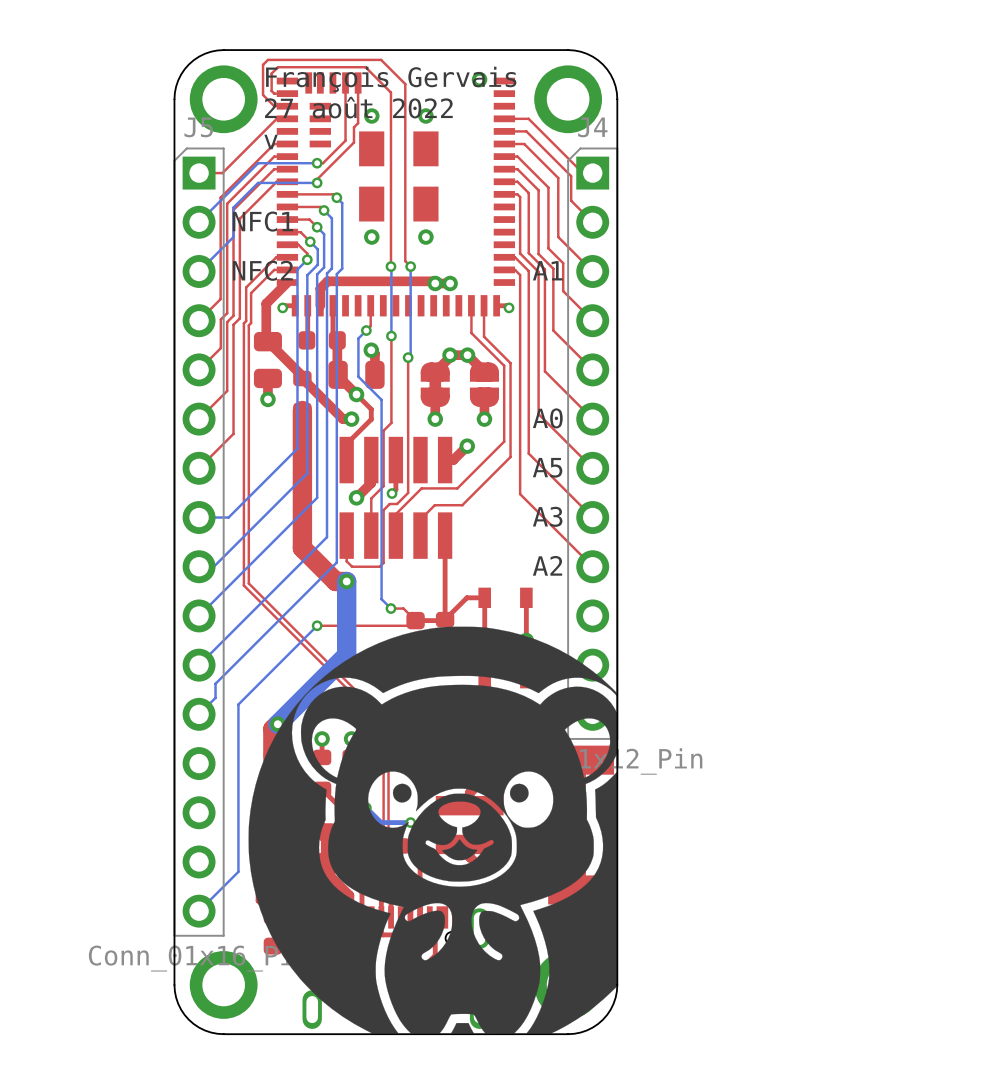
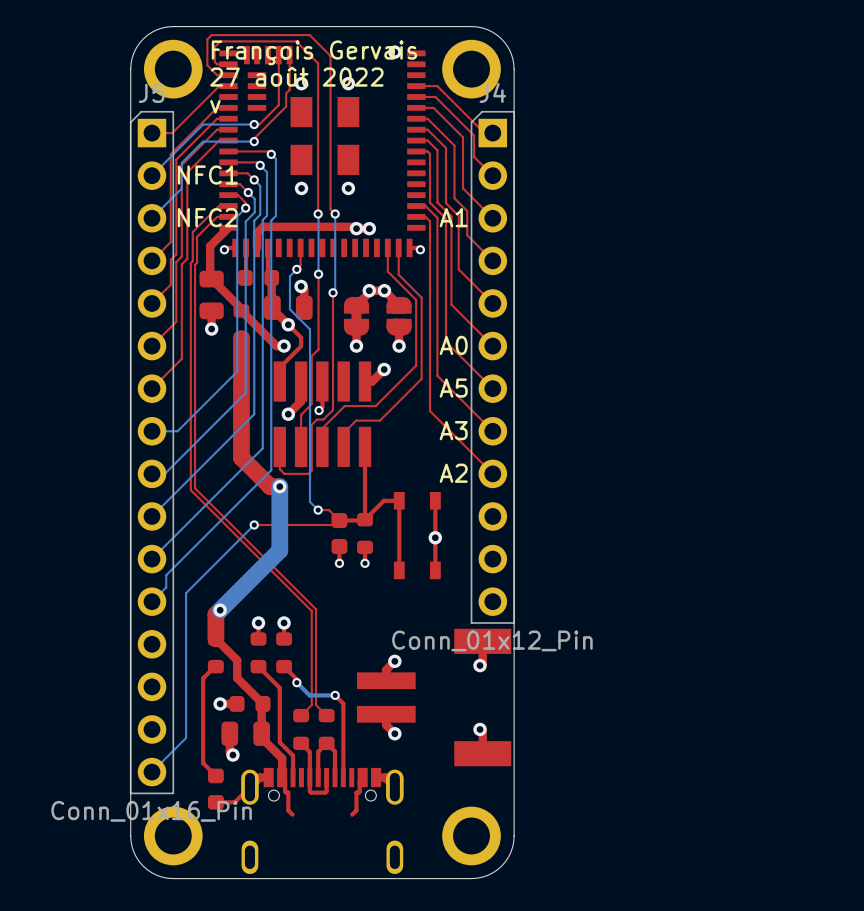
drawing: [248, 626, 618, 1034] -> none

